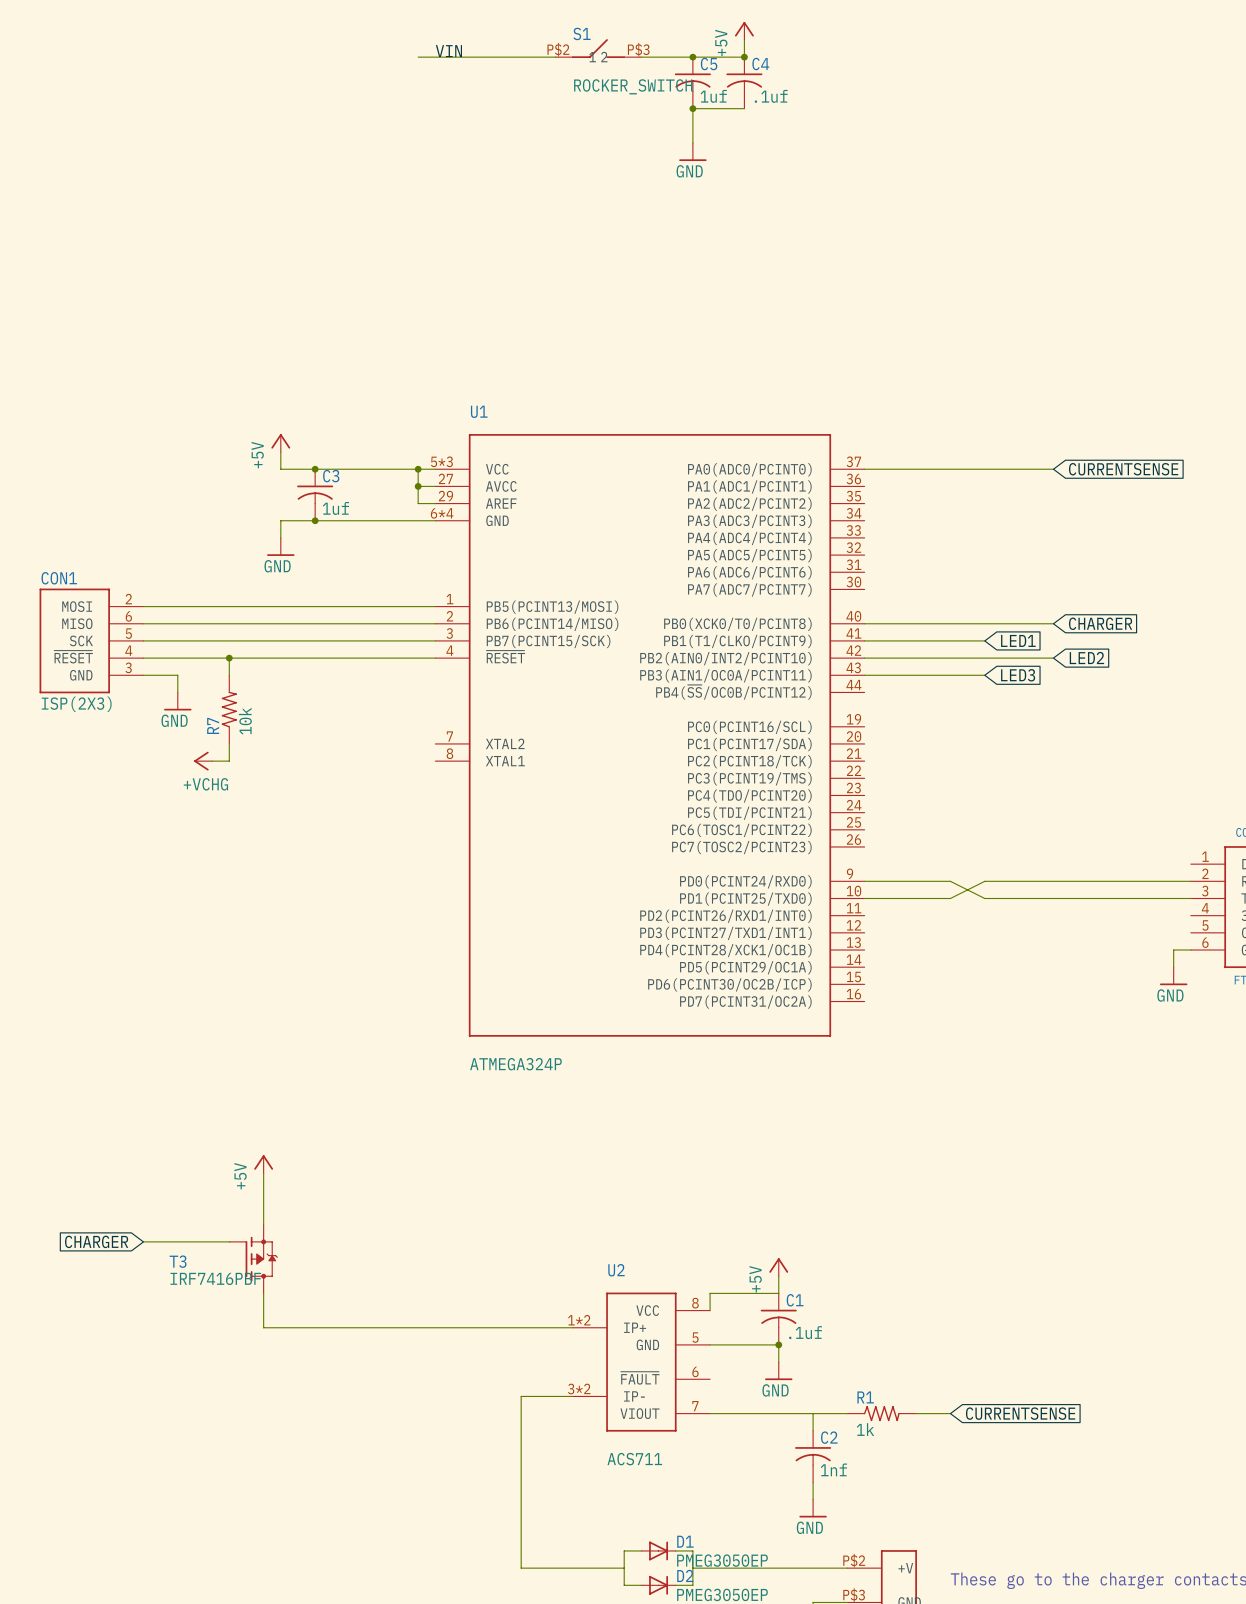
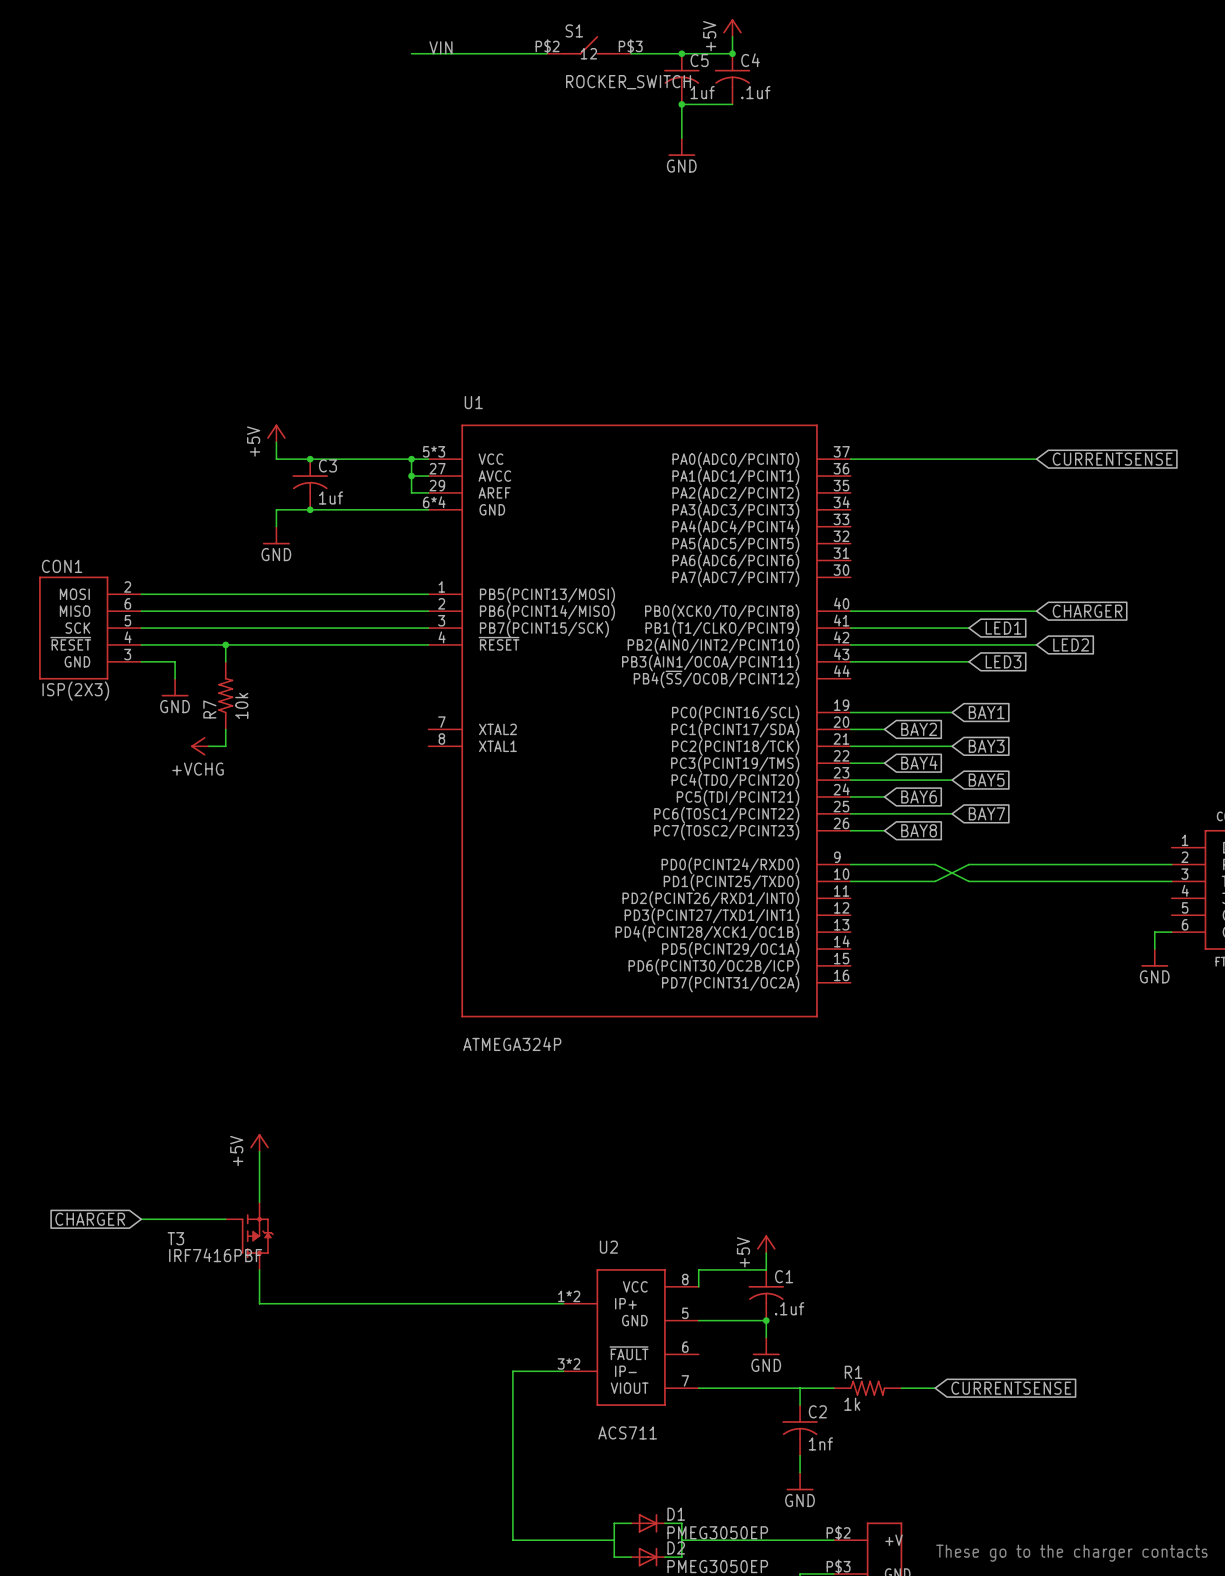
wire: none -> (850, 712) (952, 712)
global label: none -> BAY1 (986, 712)
wire: none -> (850, 729) (884, 729)
global label: none -> BAY2 (919, 729)
wire: none -> (850, 746) (952, 746)
global label: none -> BAY3 (986, 746)
wire: none -> (850, 763) (884, 763)
global label: none -> BAY4 (919, 762)
wire: none -> (850, 780) (952, 780)
global label: none -> BAY5 (986, 780)
wire: none -> (850, 796) (884, 796)
global label: none -> BAY6 (919, 796)
wire: none -> (850, 813) (952, 813)
global label: none -> BAY7 (986, 813)
wire: none -> (850, 830) (884, 830)
global label: none -> BAY8 (919, 830)

